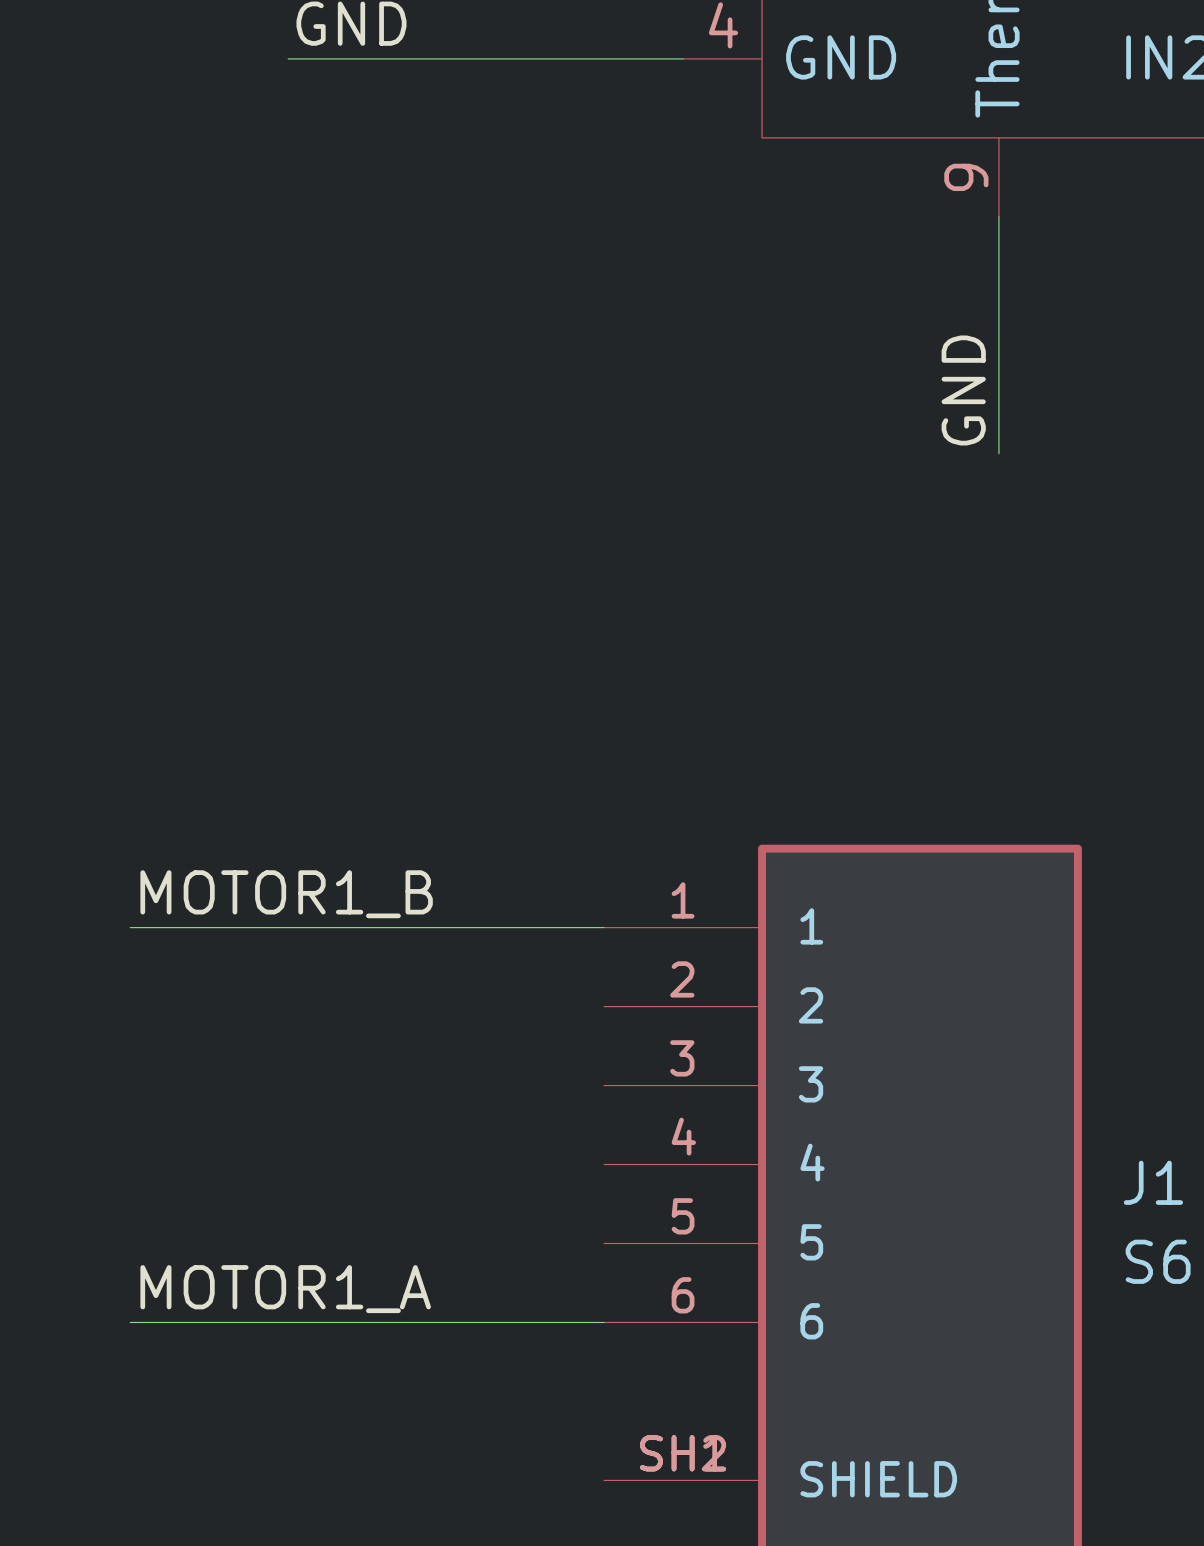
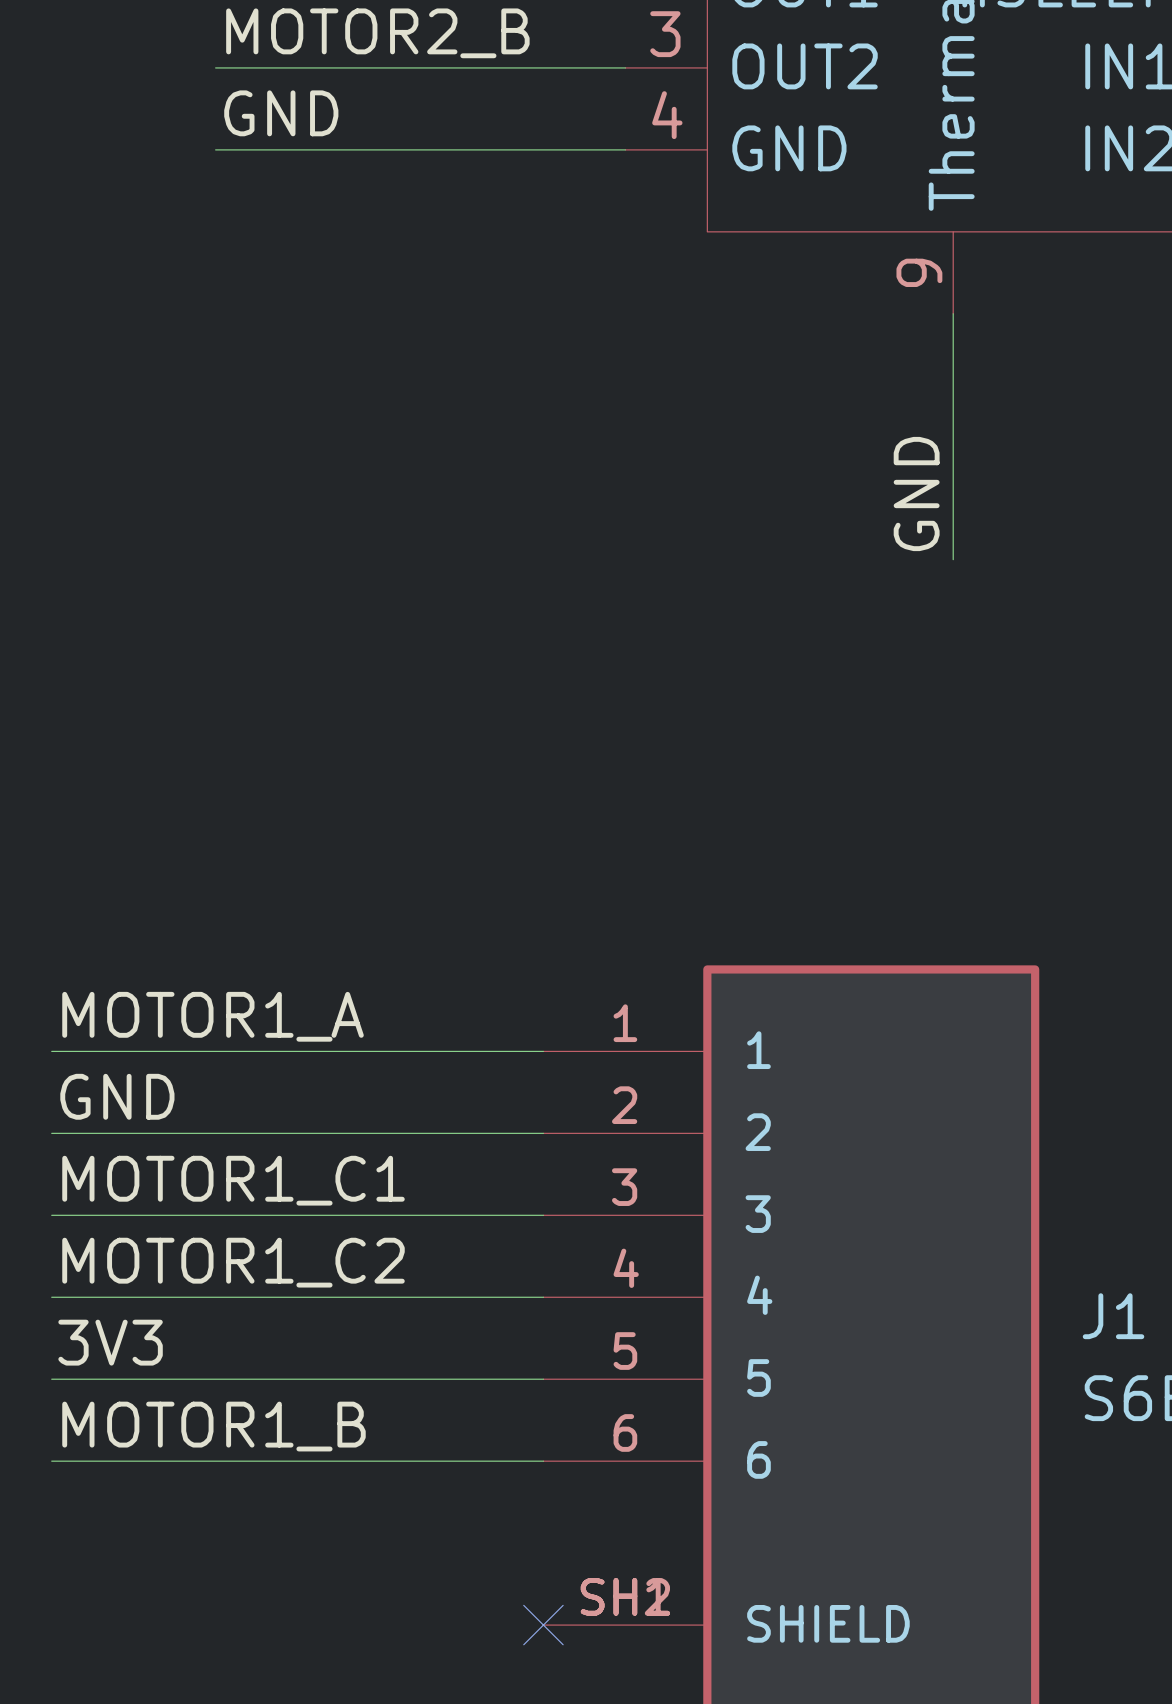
label: MOTOR1_B (286, 894) -> MOTOR1_A (213, 1016)
label: none -> GND (117, 1096)
wire: none -> (51, 1133) (543, 1133)
label: none -> MOTOR1_C1 (233, 1180)
wire: none -> (51, 1215) (543, 1215)
label: none -> MOTOR1_C2 (233, 1262)
wire: none -> (51, 1297) (543, 1297)
label: none -> 3V3 (110, 1342)
wire: none -> (51, 1379) (543, 1379)
label: MOTOR1_A (285, 1289) -> MOTOR1_B (213, 1426)
no-connect mark: none -> (543, 1625)

